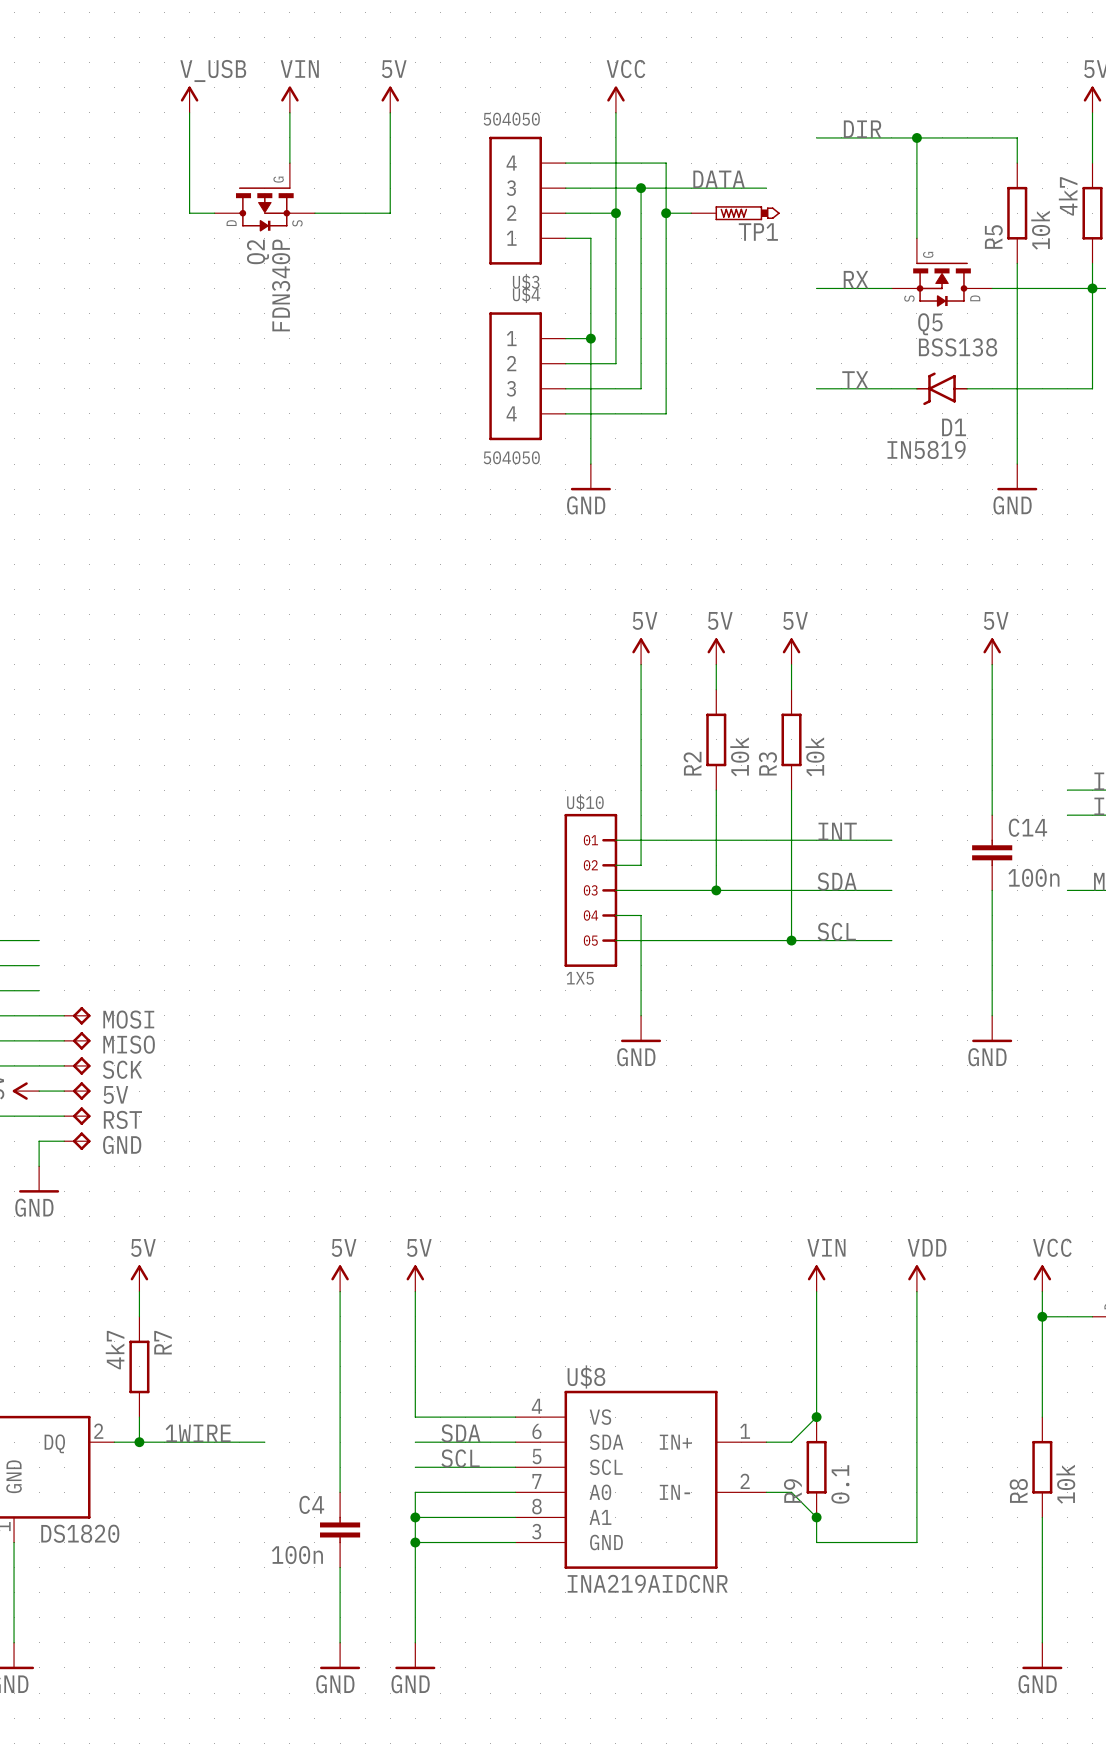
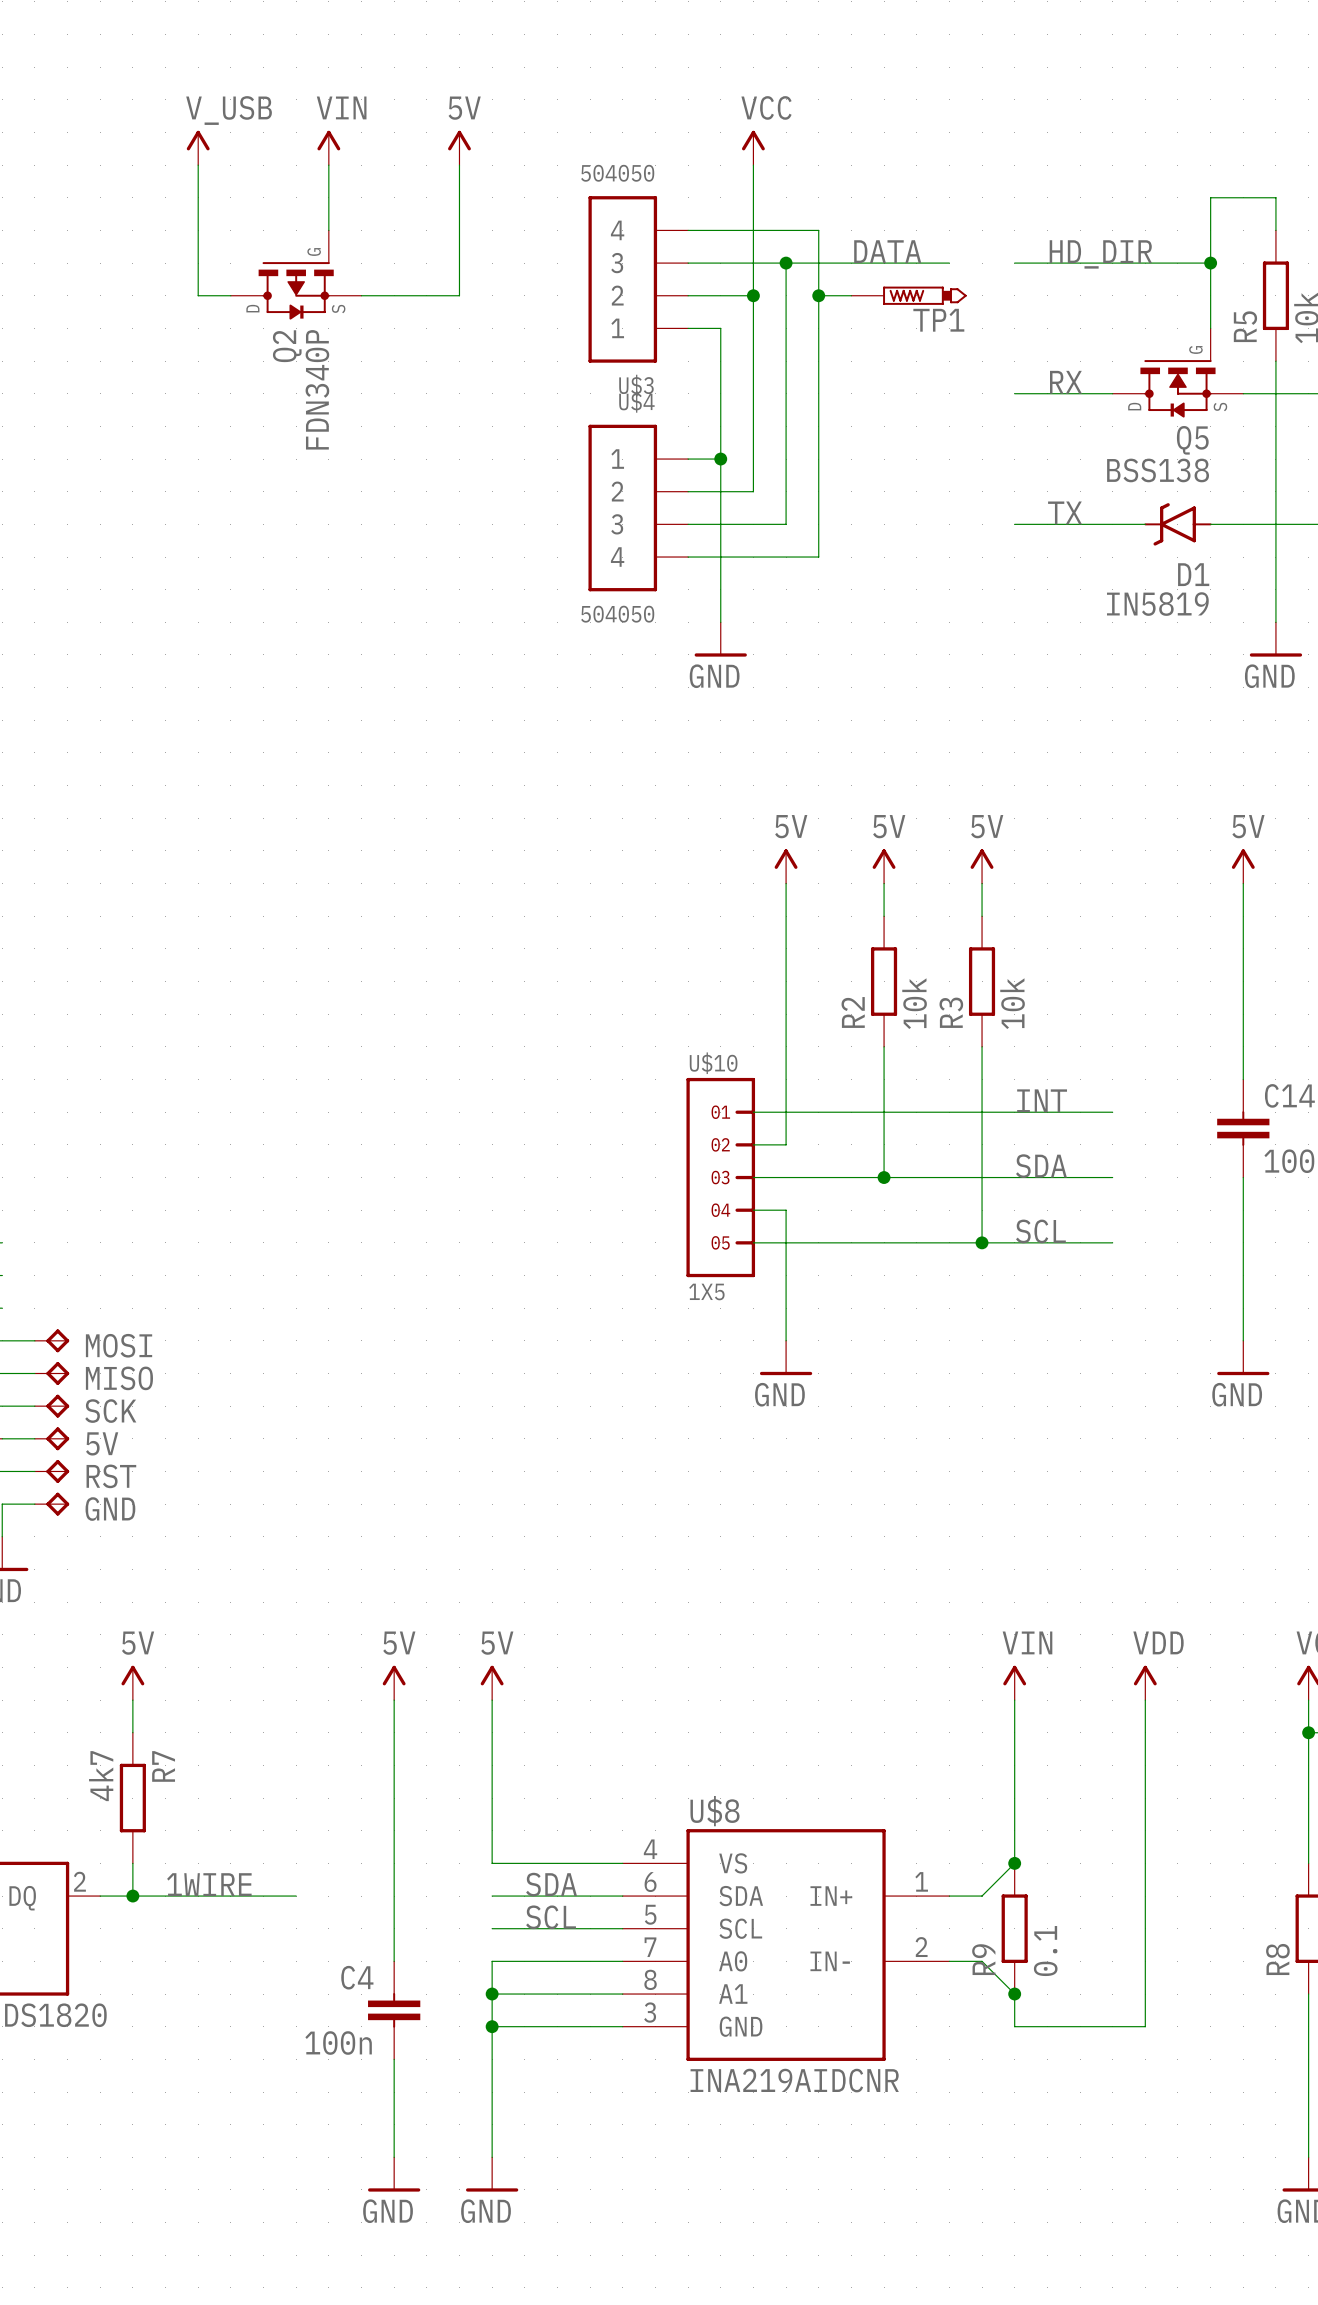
label: DIR (862, 129) -> none
wire: (816, 137) (967, 137) -> (1210, 328) (1210, 197)
wire: (916, 137) (916, 238) -> none
junction: (916, 137) -> none
label: none -> HD_DIR (1100, 254)
wire: none -> (1014, 263) (1210, 263)
junction: none -> (1210, 263)
Q5 symbol: [891, 238, 993, 307] -> [1112, 328, 1244, 418]
Q5 value position: BSS138 (958, 347) -> BSS138 (1158, 470)

